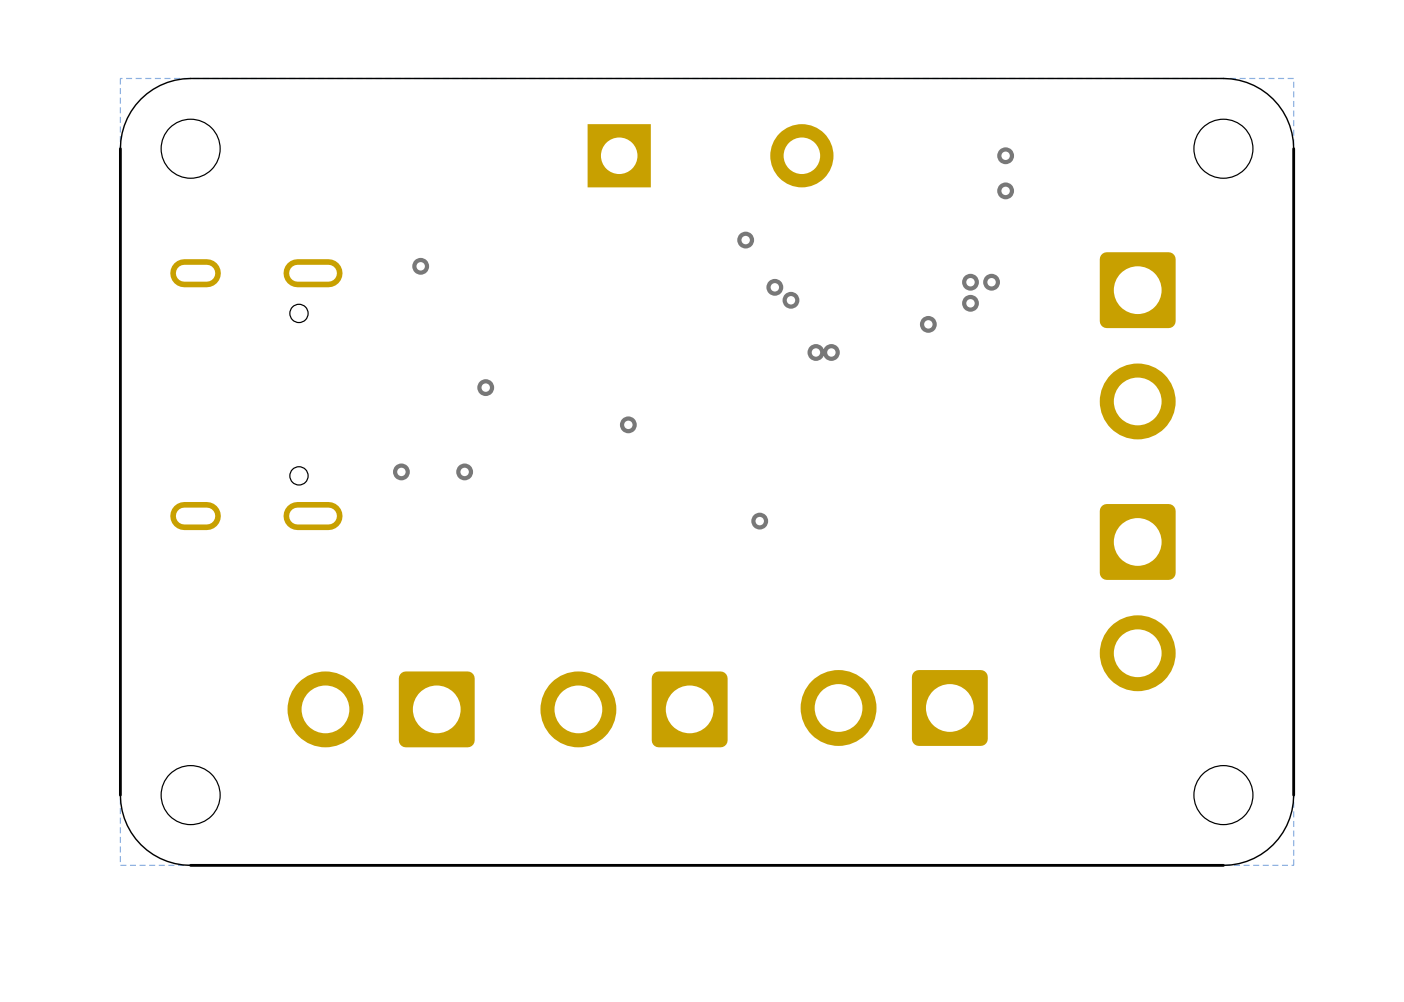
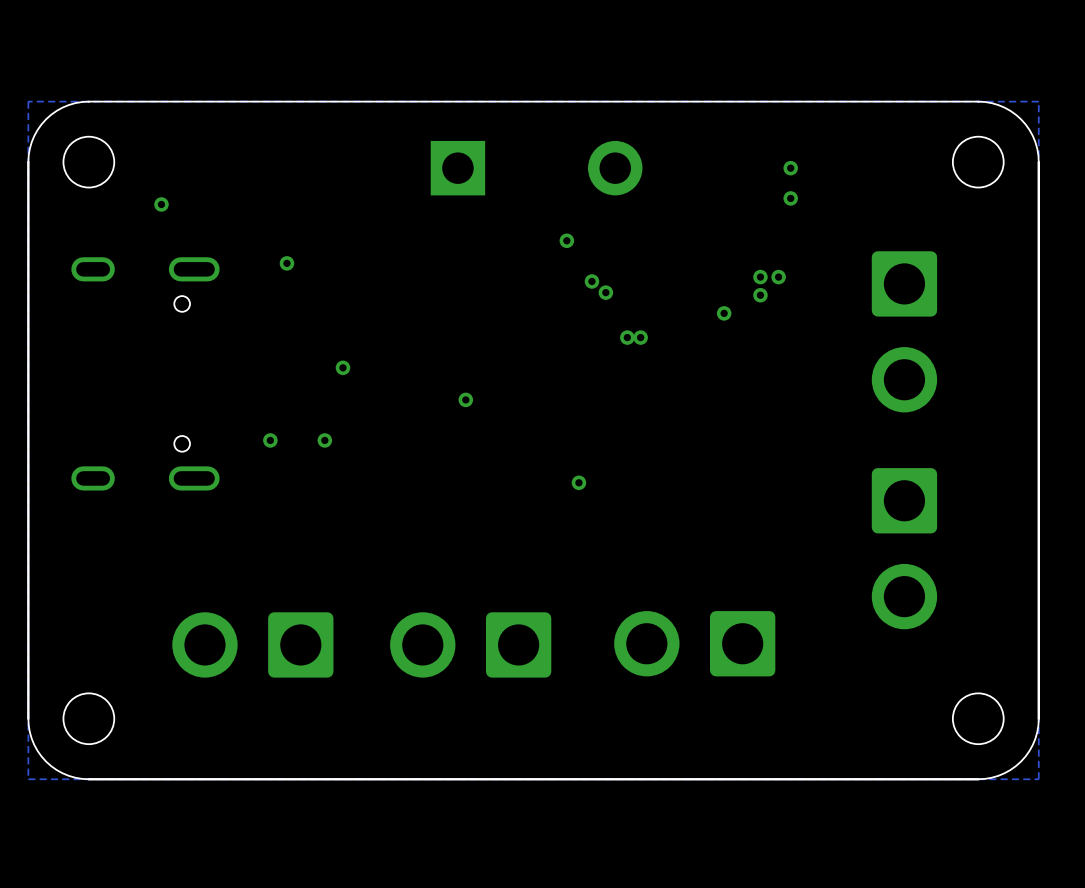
via: none -> (161, 204)

